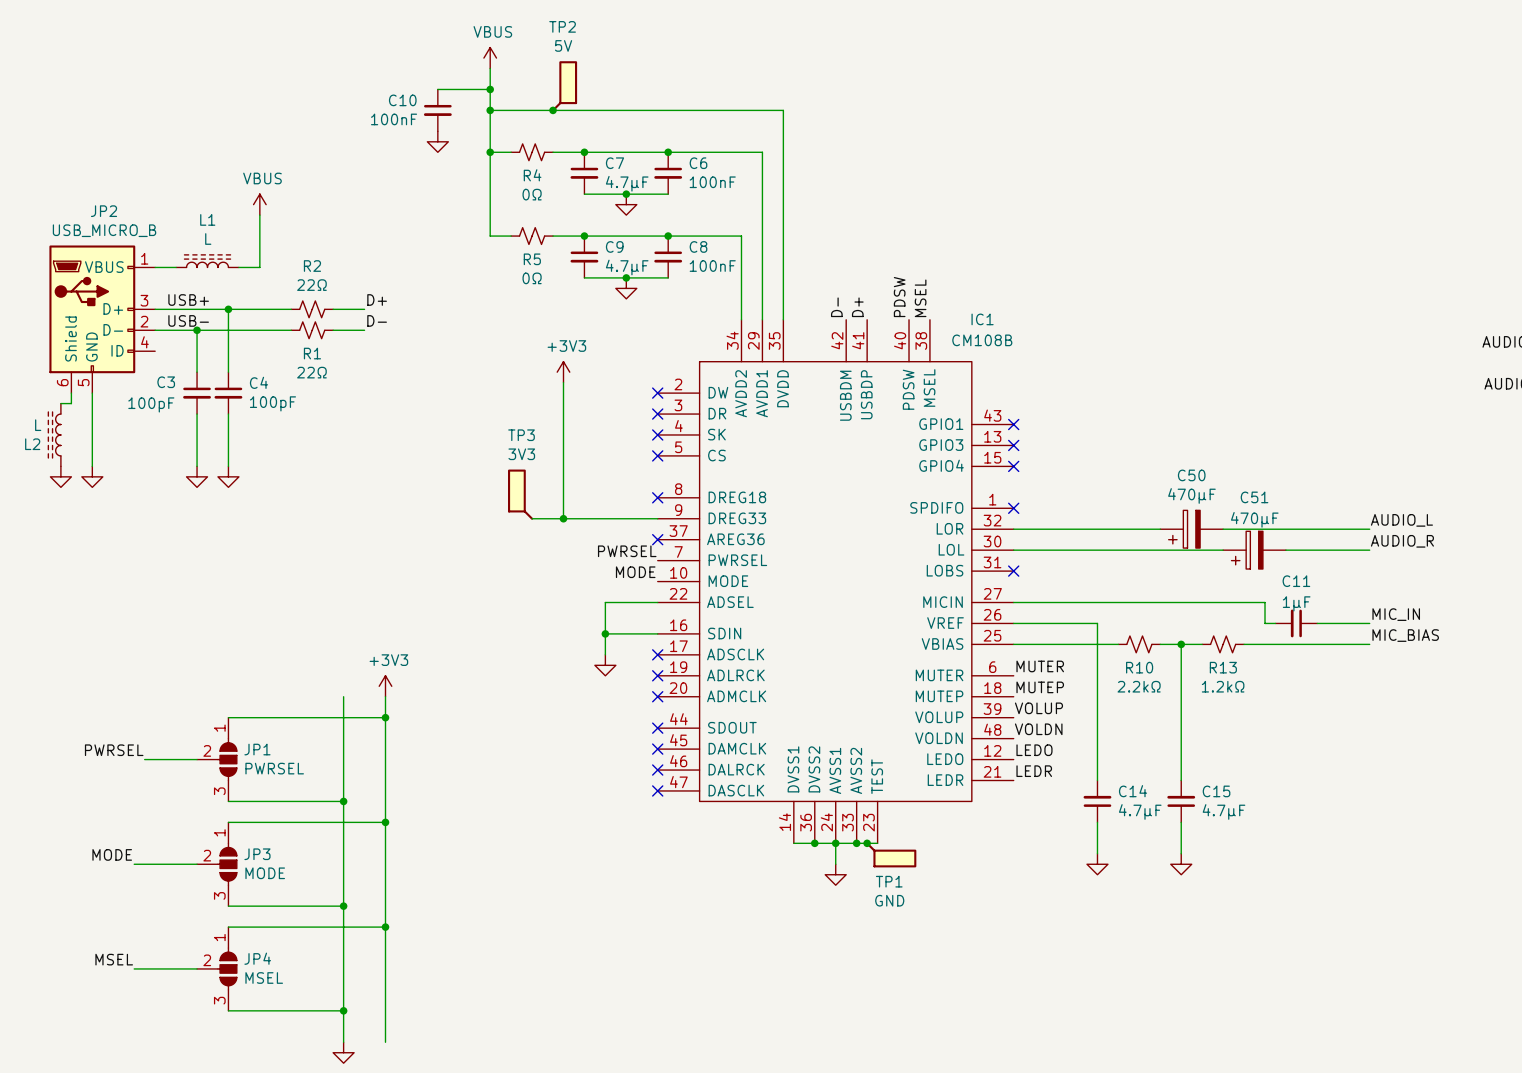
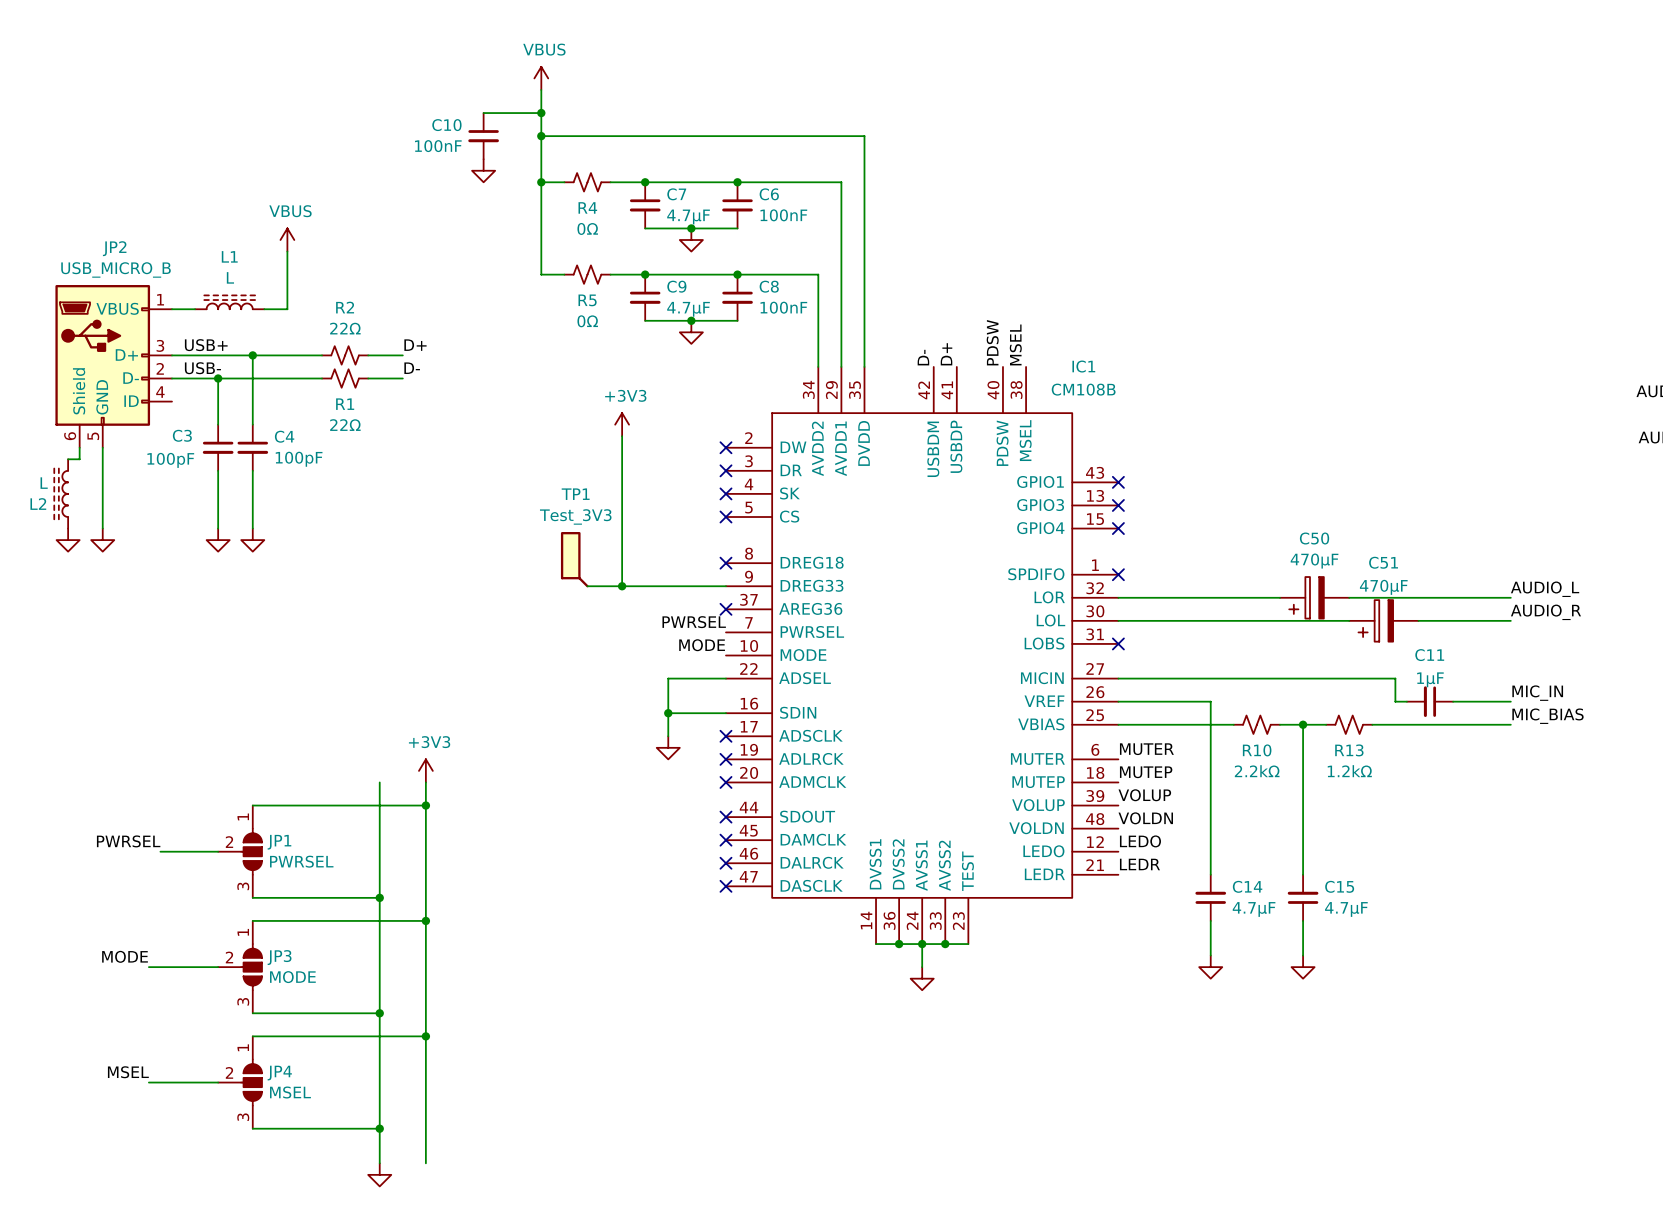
TP2: 5V (564, 86) -> none
junction: (553, 110) -> none
TP3 name: TP3 (521, 435) -> TP1 (575, 494)
TP3 value: 3V3 (521, 454) -> Test_3V3 (575, 516)
junction: (867, 843) -> none
TP1: GND (891, 854) -> none

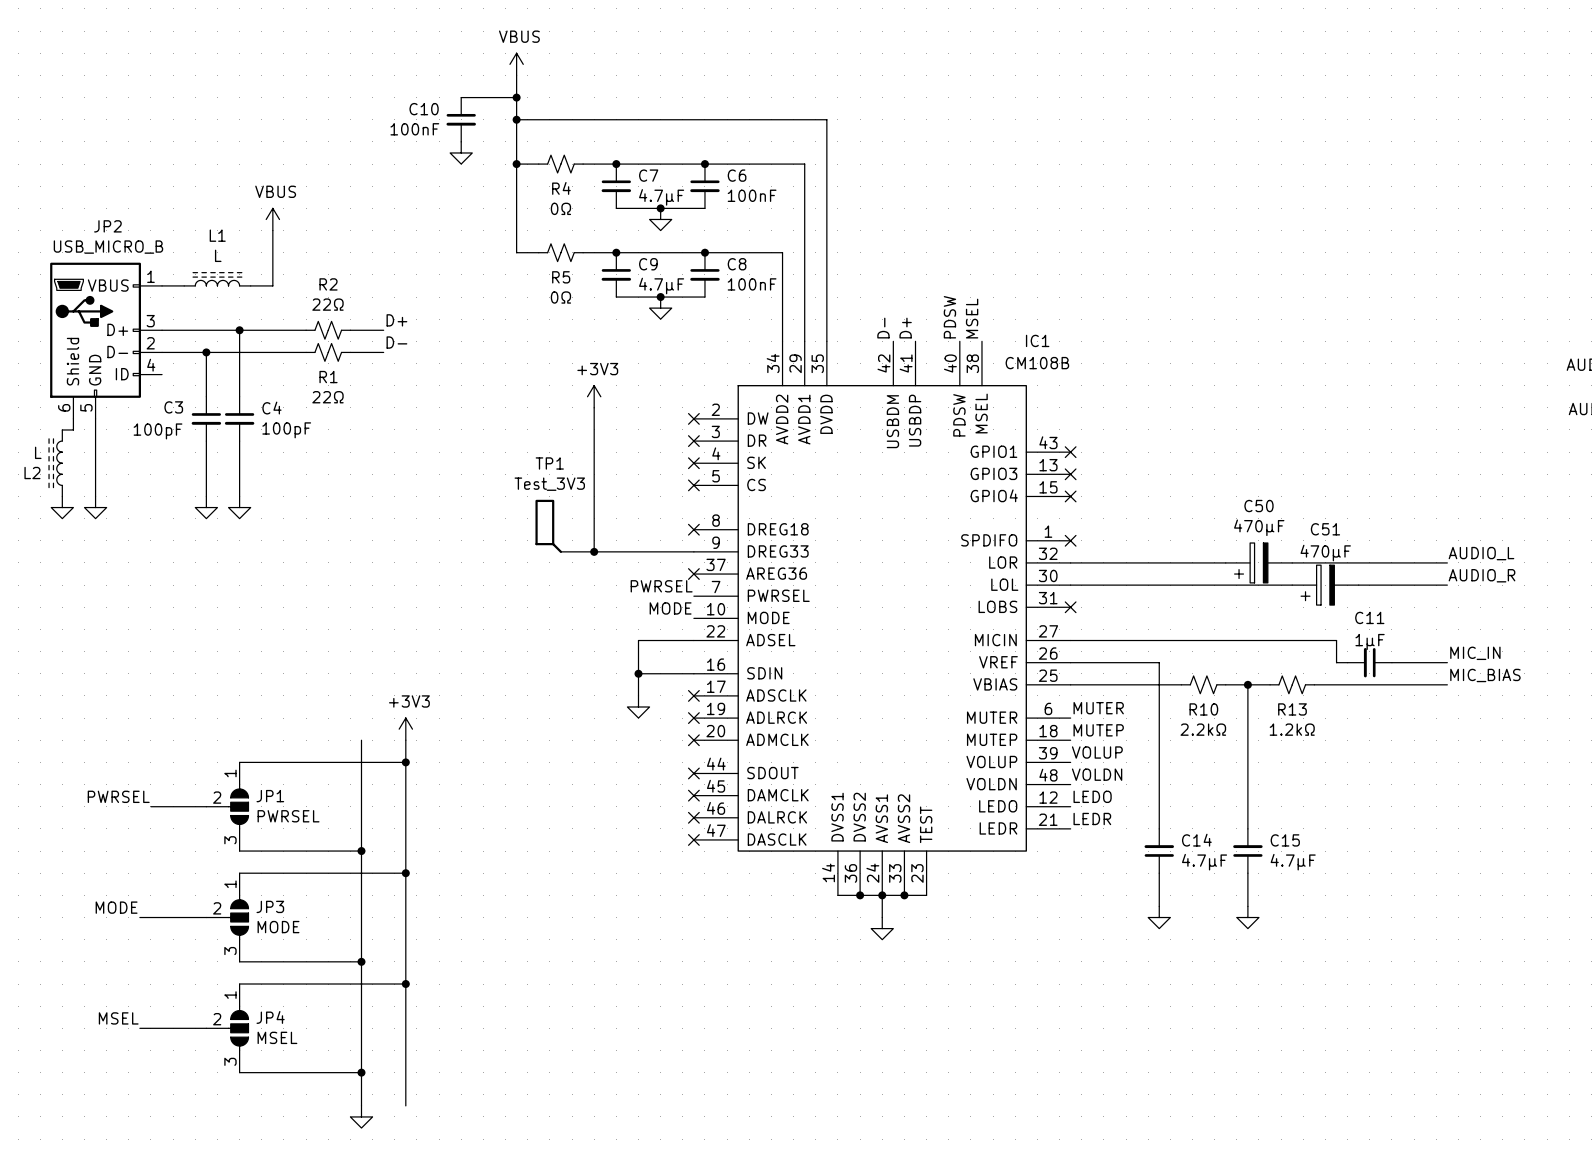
label: USB+ (206, 345) -> none
label: USB- (202, 368) -> none

